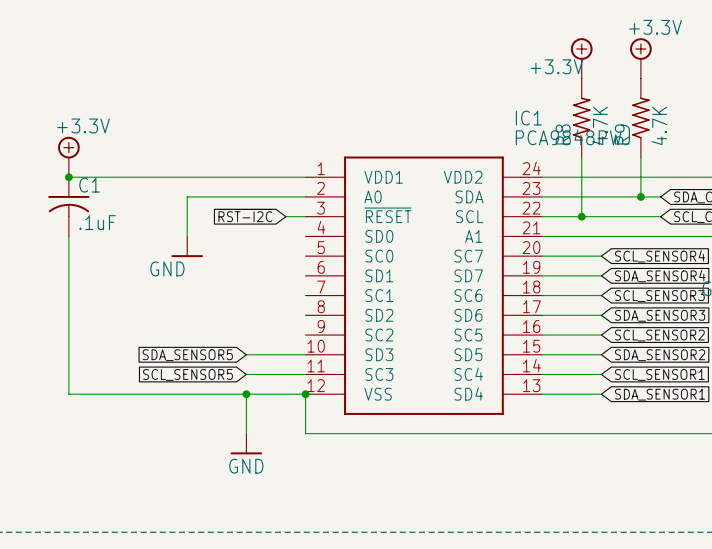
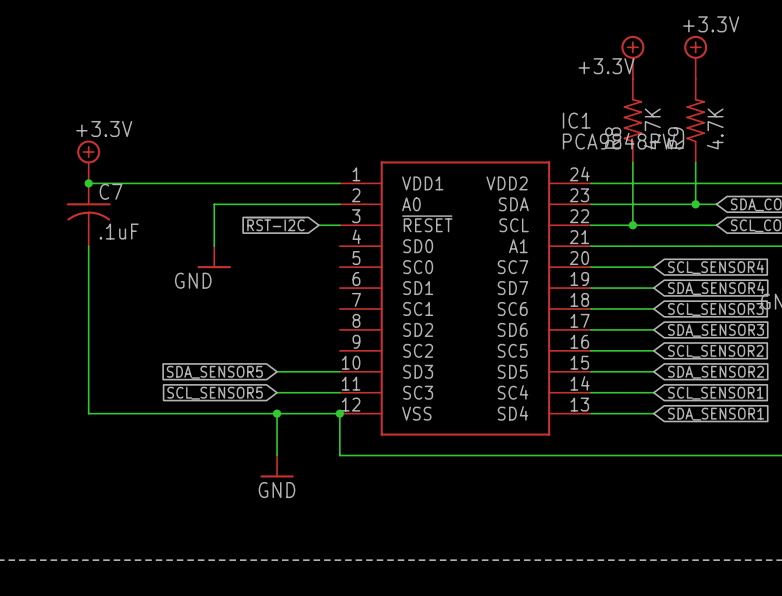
C1 name: C1 (89, 185) -> C7 (111, 191)

